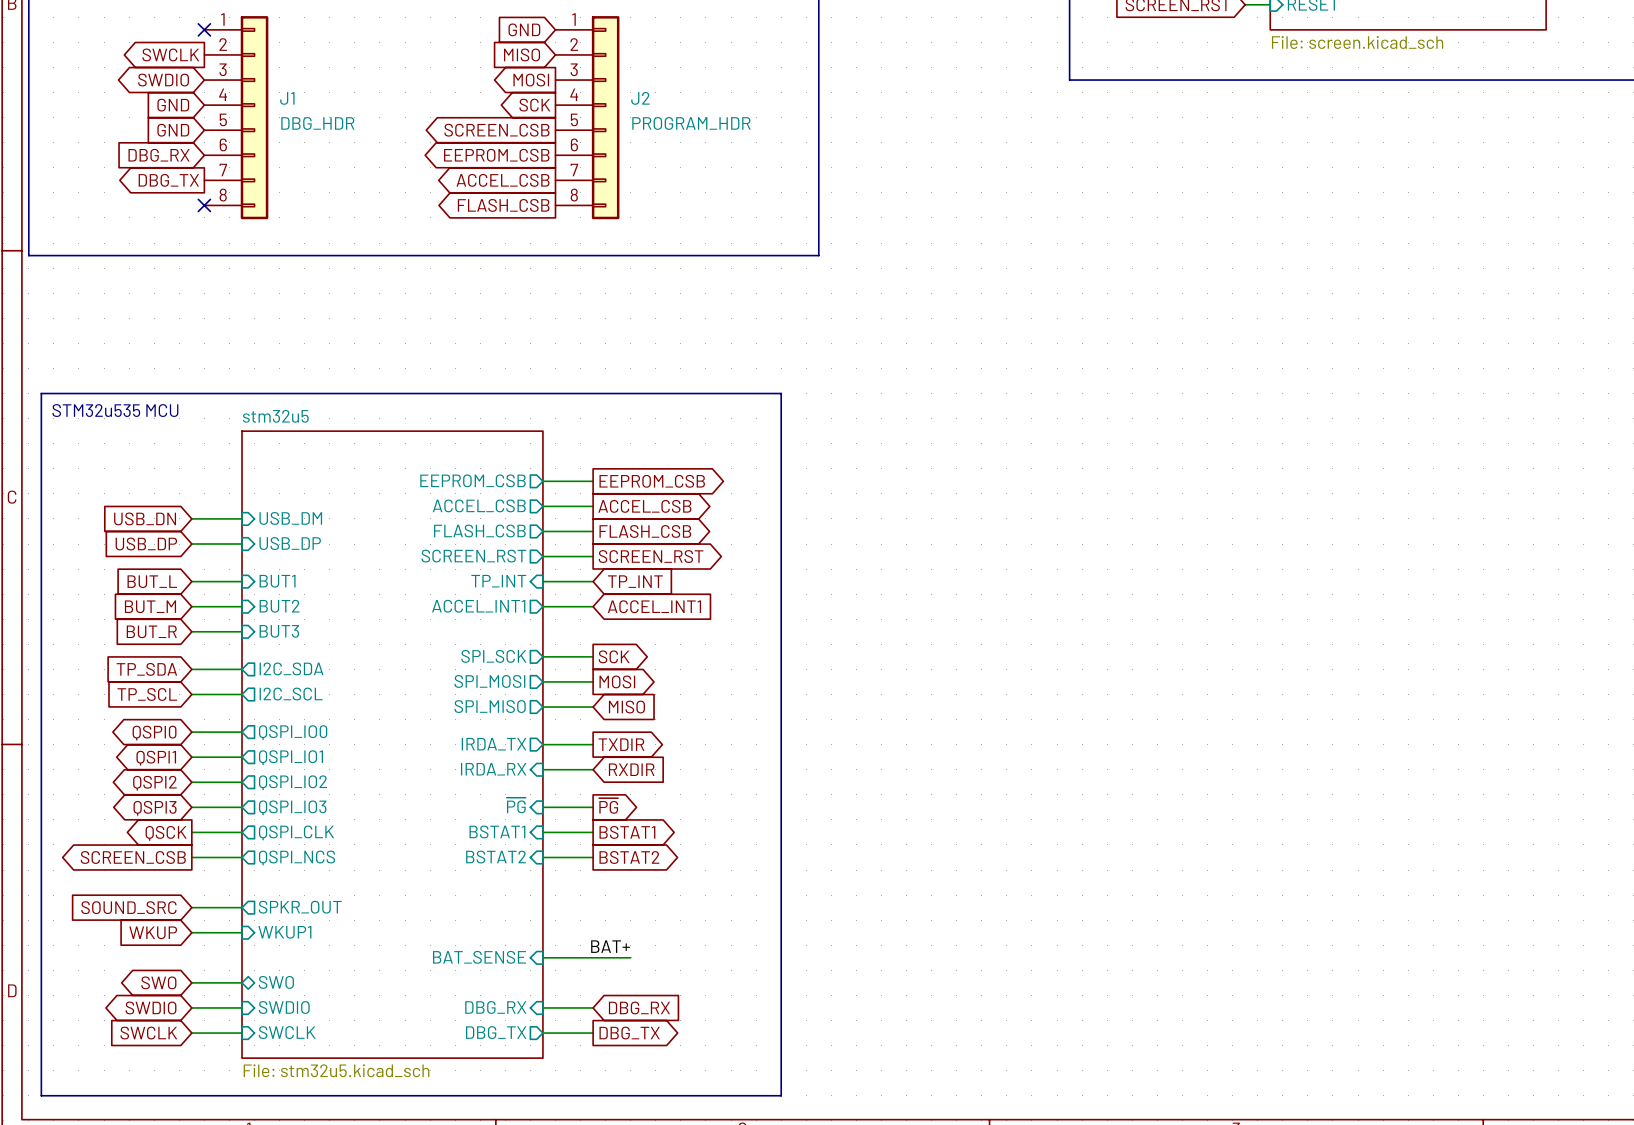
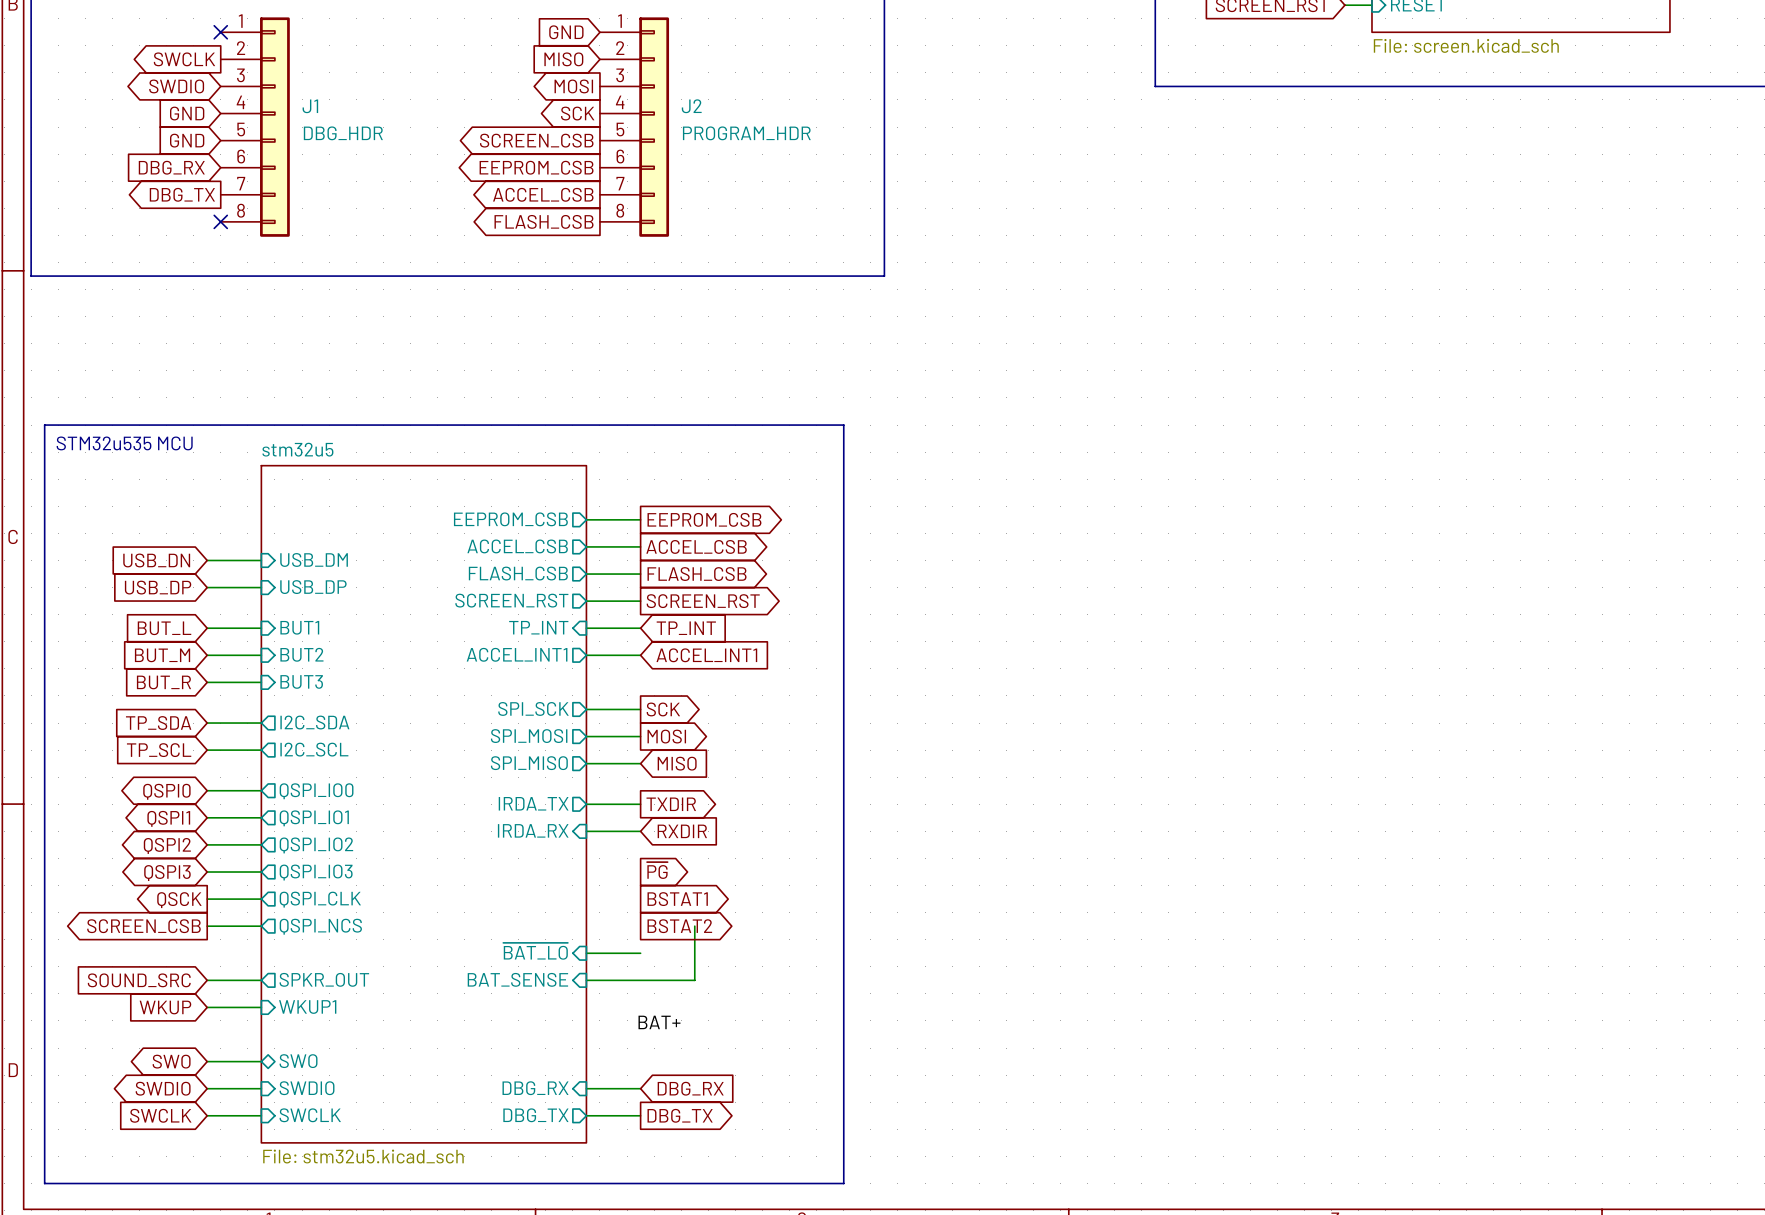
sheet pin: ~{PG} (516, 805) -> none
wire: (542, 807) (593, 807) -> none
sheet pin: BSTAT1 (497, 831) -> none
wire: (542, 832) (593, 832) -> none
sheet pin: BSTAT2 (496, 857) -> none
wire: (542, 857) (593, 857) -> (586, 953) (640, 953)
wire: none -> (694, 926) (694, 980) (586, 980)
sheet pin: none -> ~{BAT_LO} (535, 951)
sheet pin position: BAT_SENSE (479, 957) -> BAT_SENSE (517, 979)
wire: (542, 957) (630, 957) -> none

